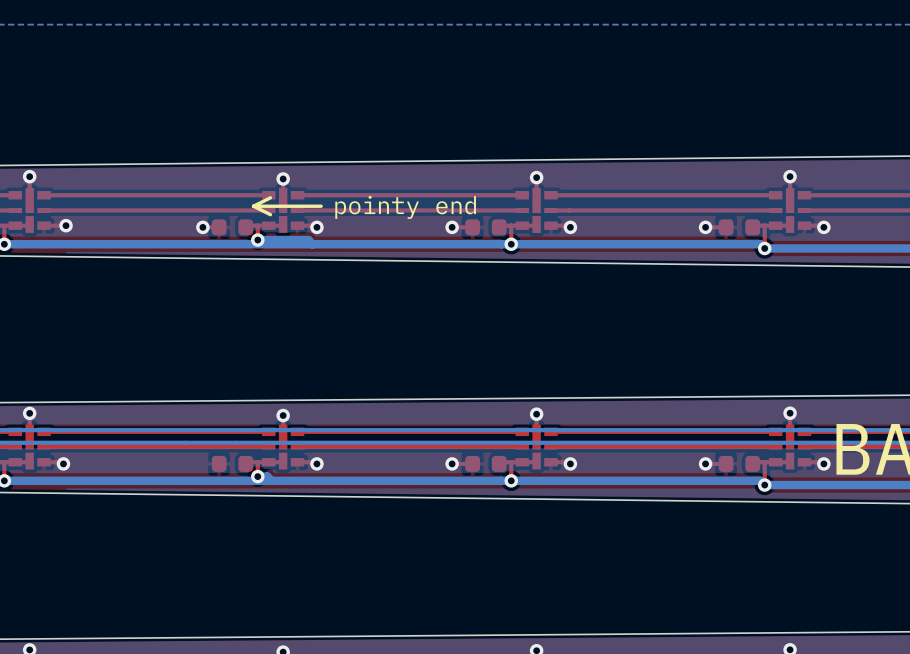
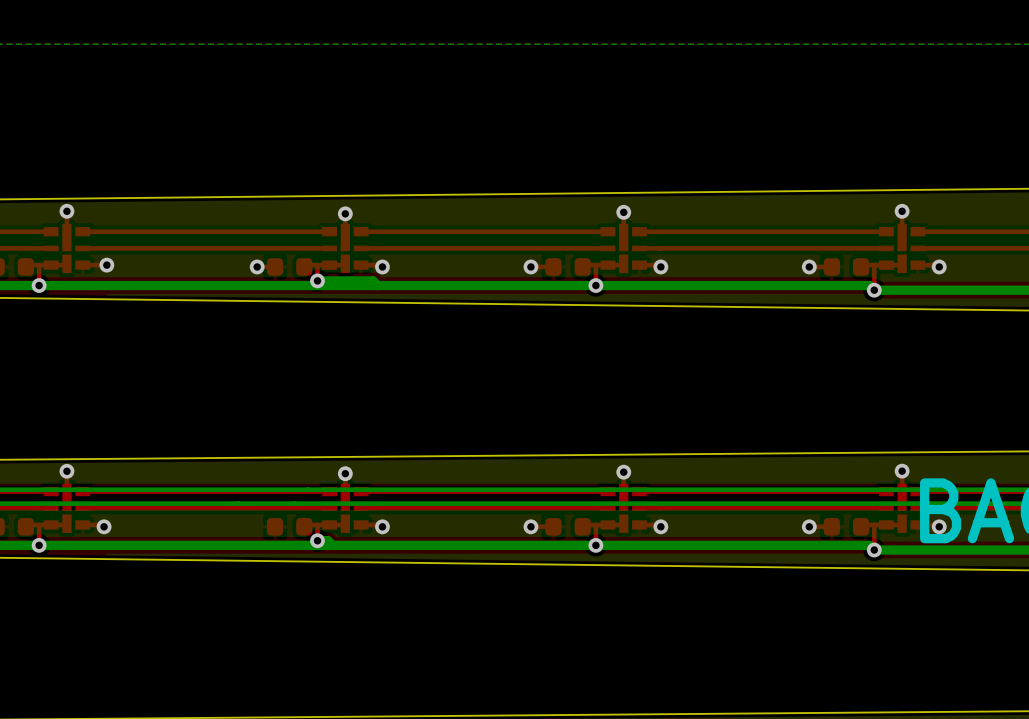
line: (270, 197) (253, 206) -> none
line: (253, 206) (270, 214) -> none
line: (321, 206) (253, 206) -> none
text: pointy end (405, 207) -> none

